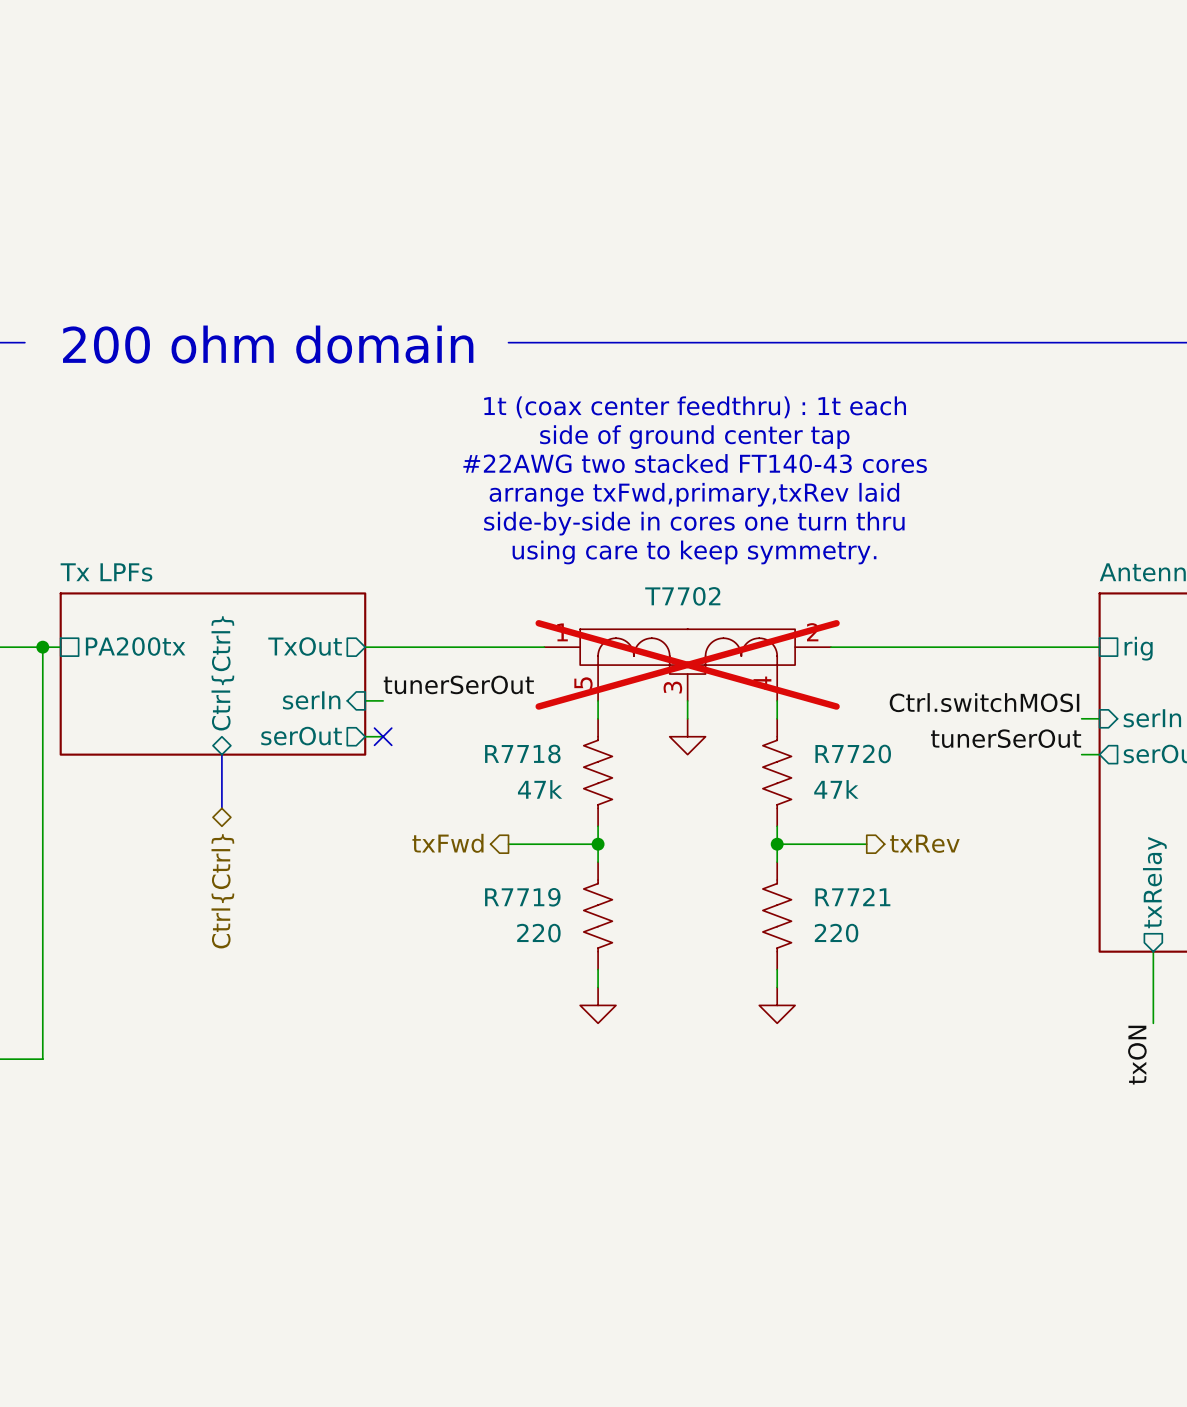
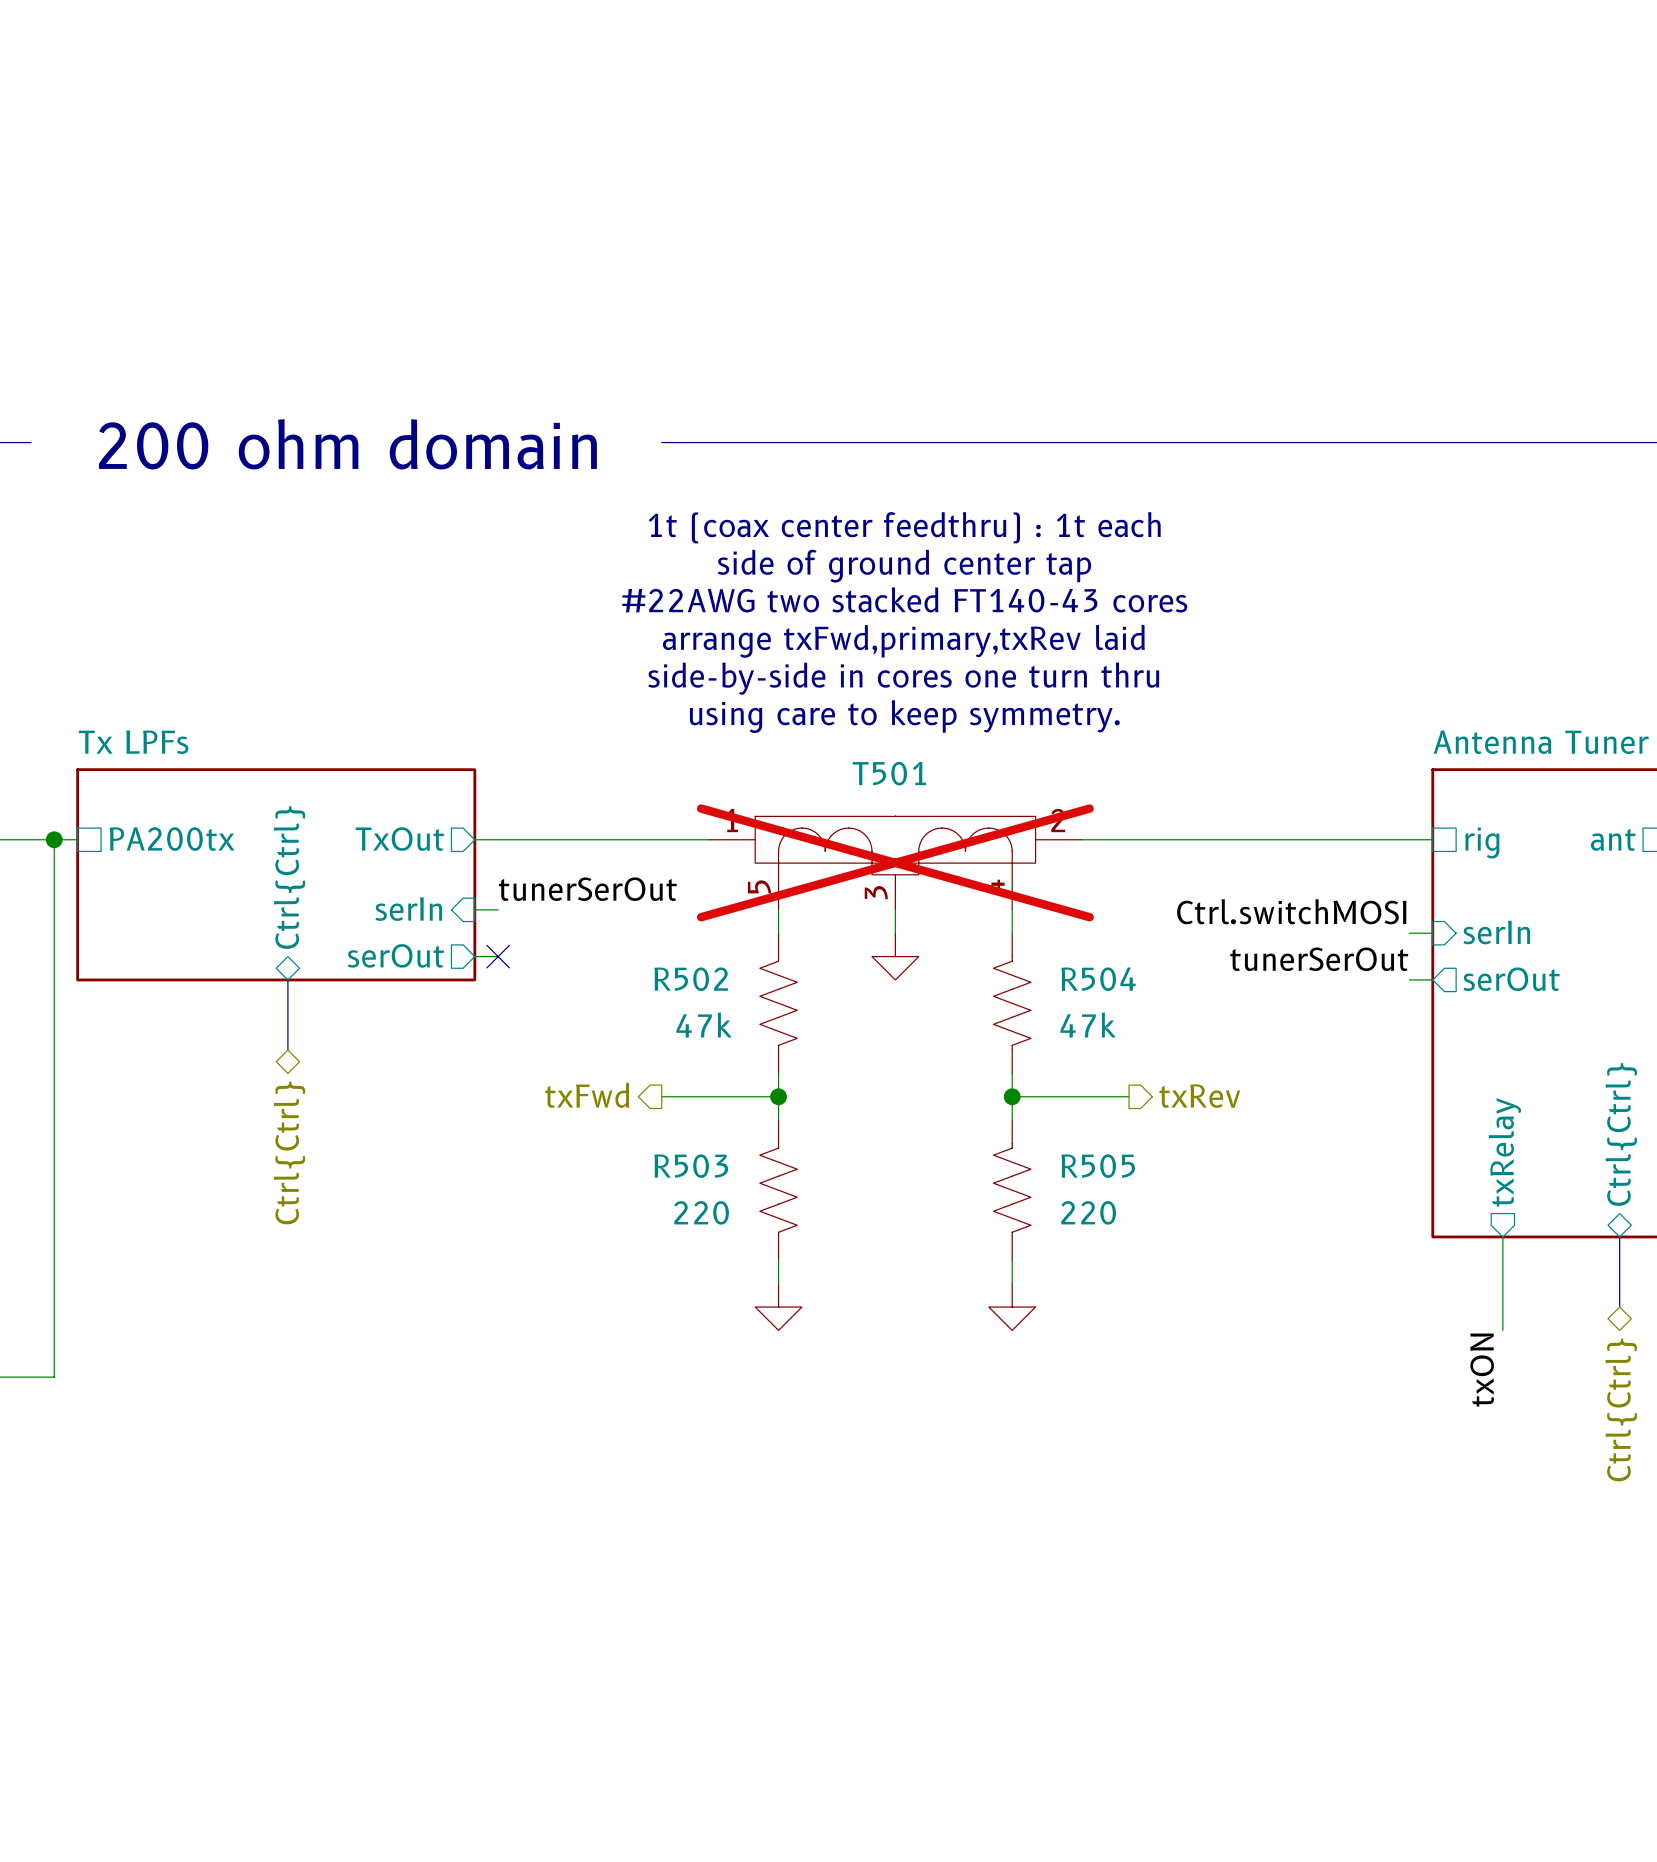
T7702 name: T7702 (682, 596) -> T501 (889, 773)
R7718 name: R7718 (522, 753) -> R502 (691, 979)
R7720 name: R7720 (853, 753) -> R504 (1098, 979)
R7719 name: R7719 (522, 897) -> R503 (691, 1166)
R7721 name: R7721 (852, 897) -> R505 (1098, 1166)

